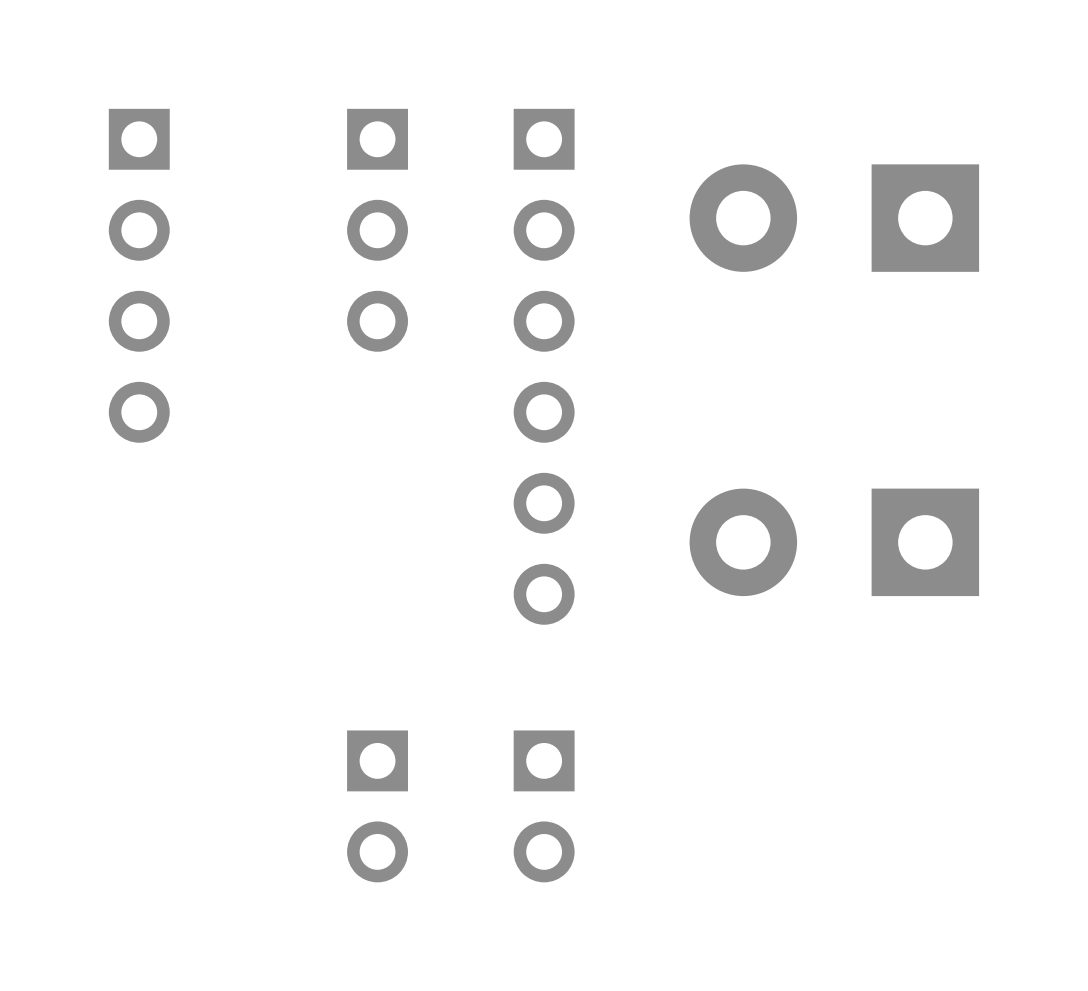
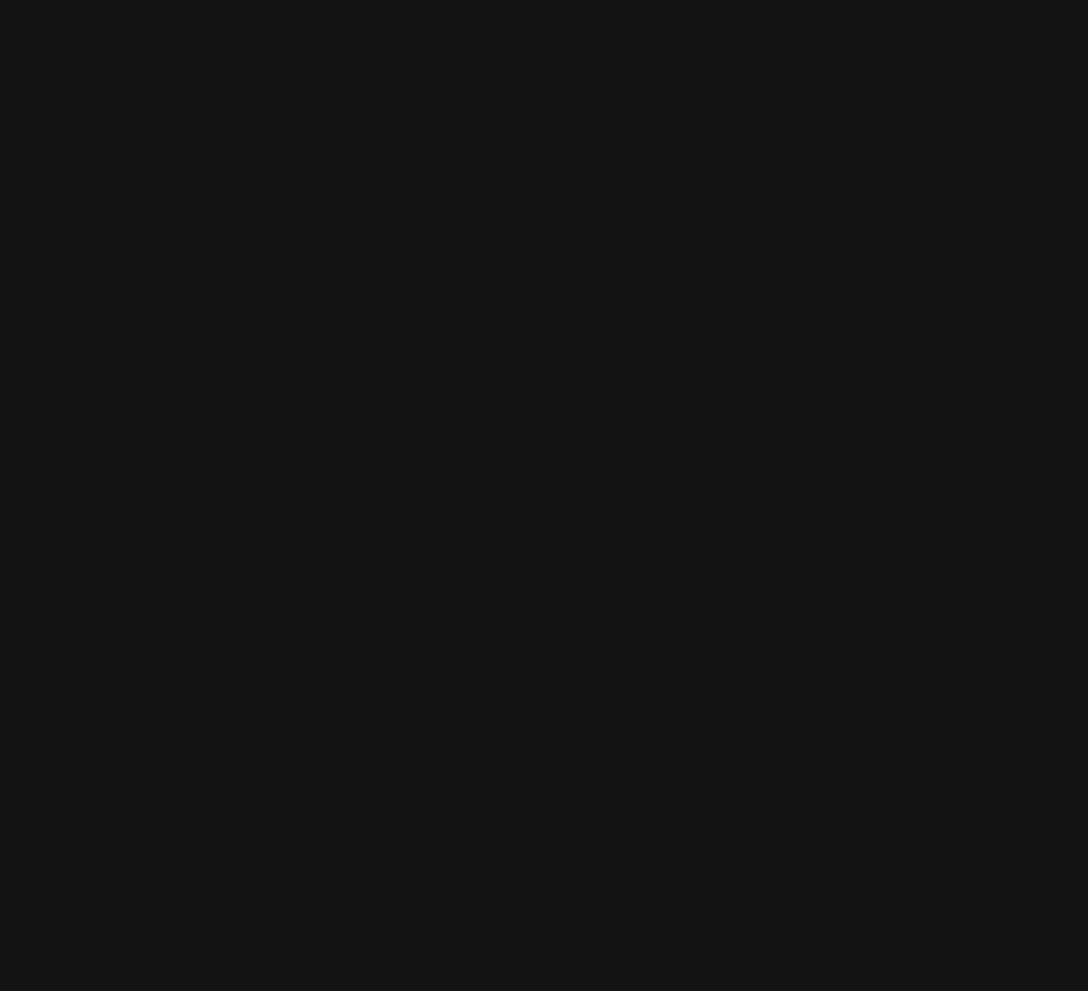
part: (834, 218) -> none
part: (377, 230) -> none
part: (139, 275) -> none
part: (544, 366) -> none
part: (834, 542) -> none
part: (377, 806) -> none
part: (544, 806) -> none

